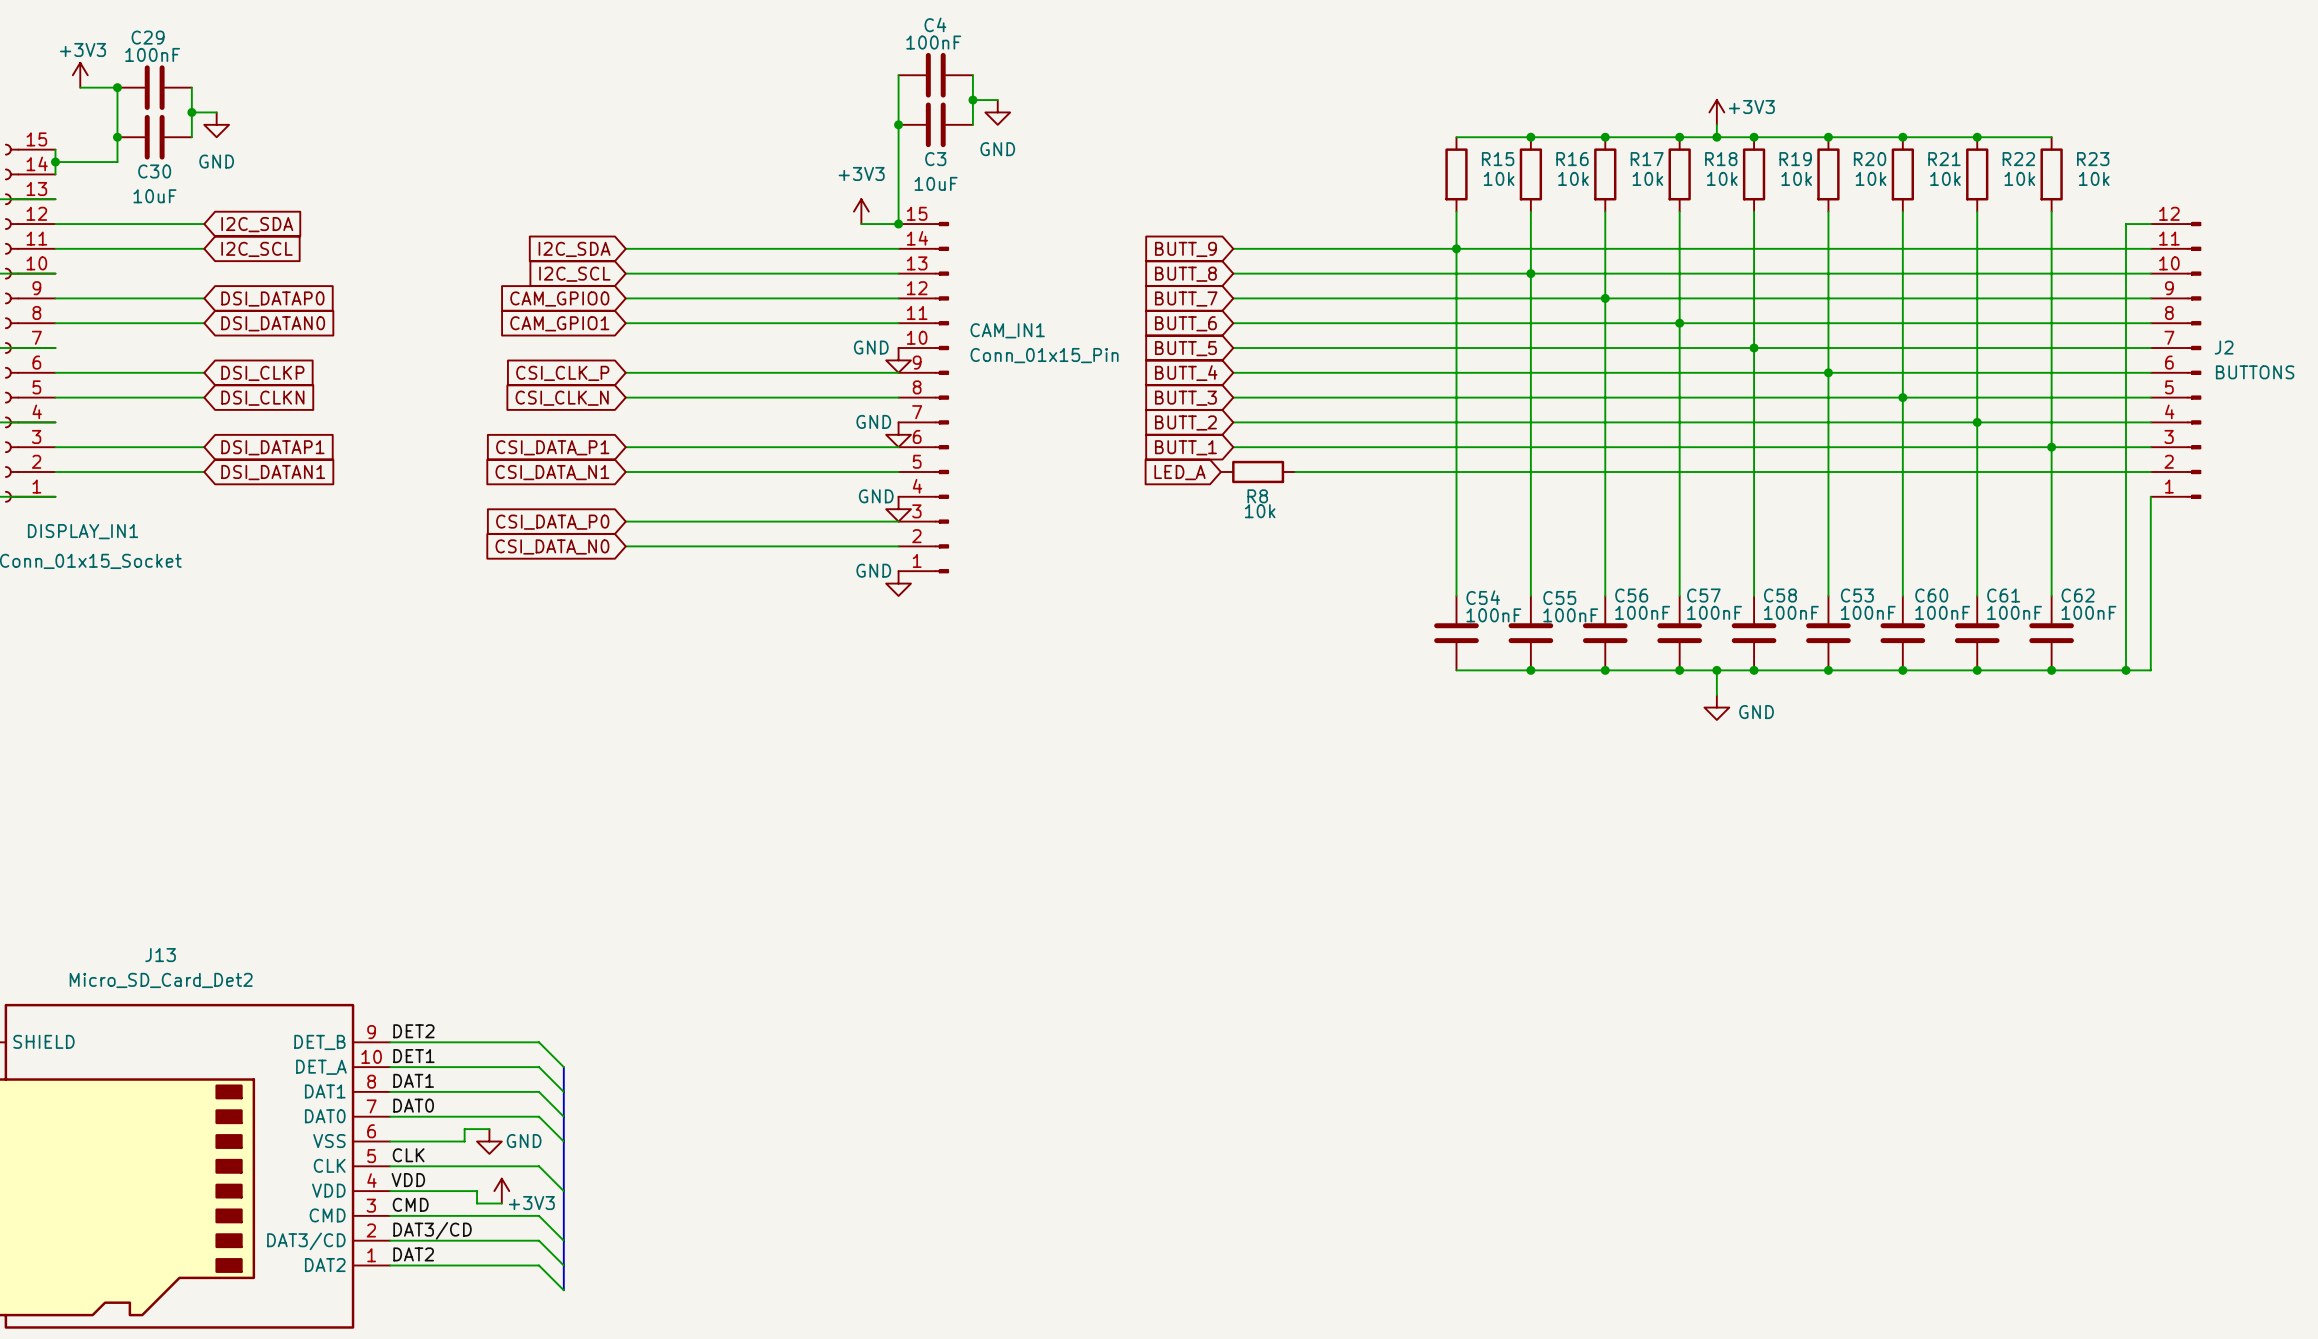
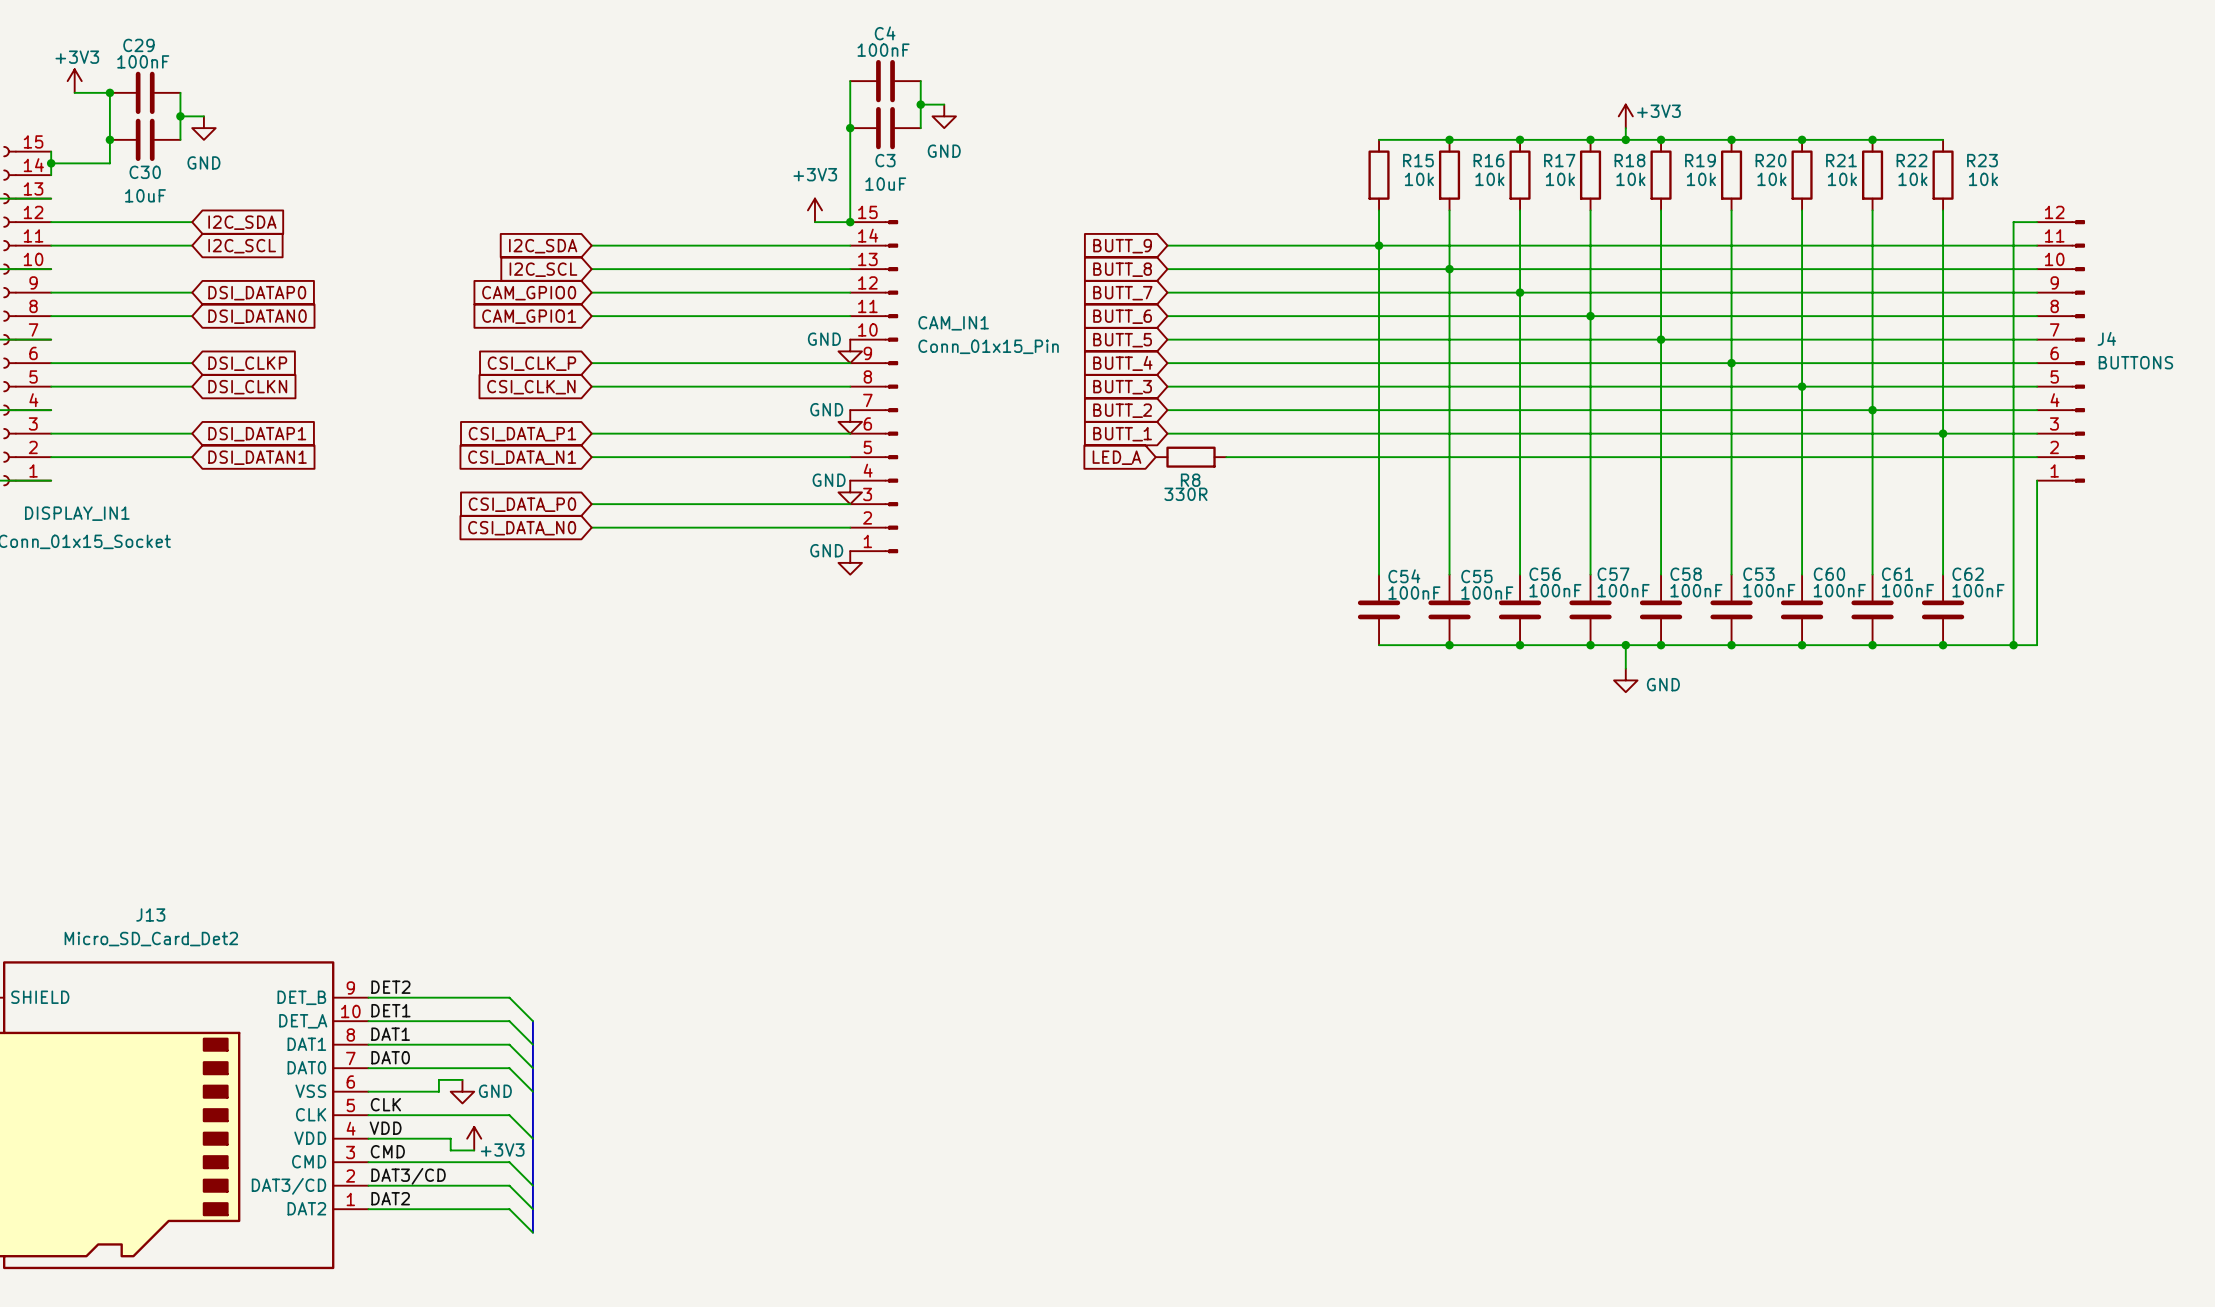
J2 name: J2 (2224, 347) -> J4 (2106, 338)
R8 value: 10k (1260, 511) -> 330R (1185, 494)

